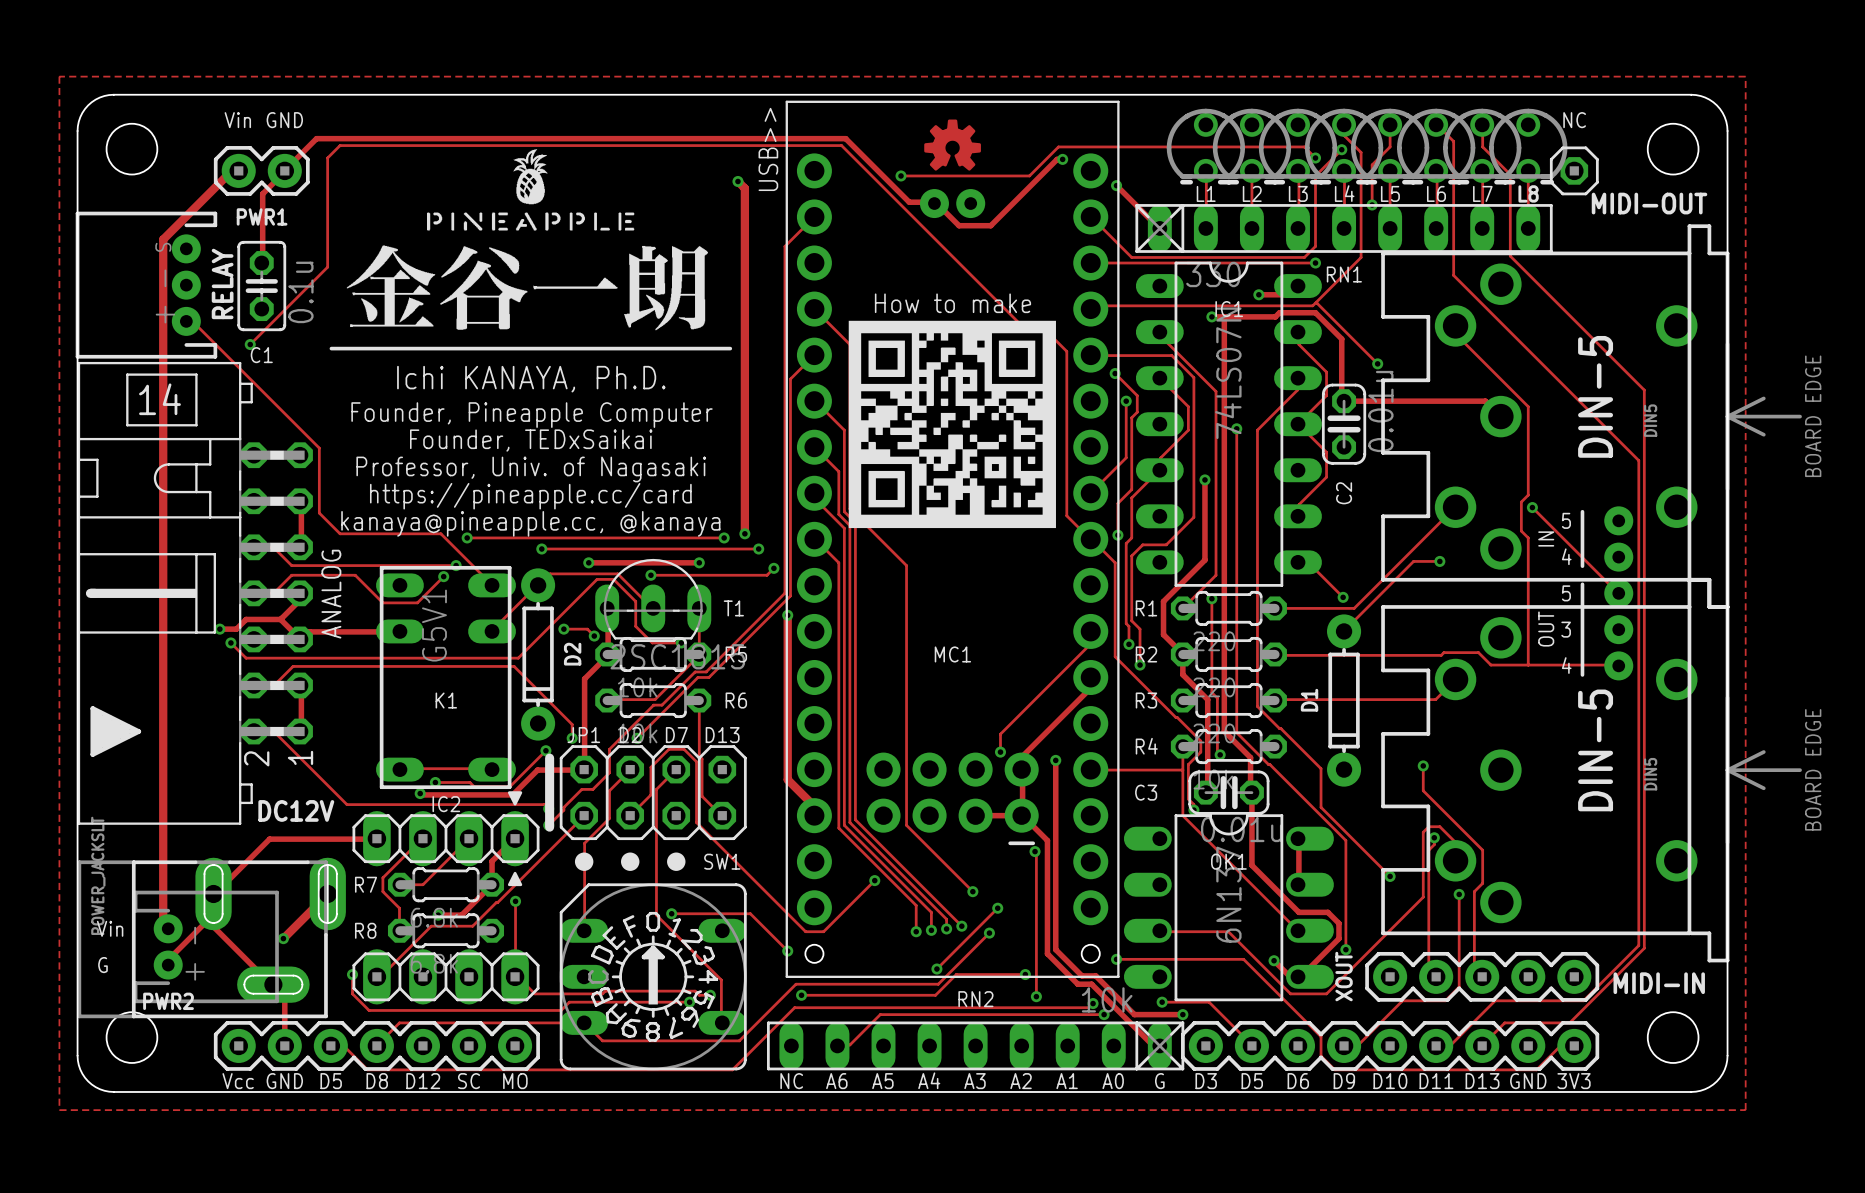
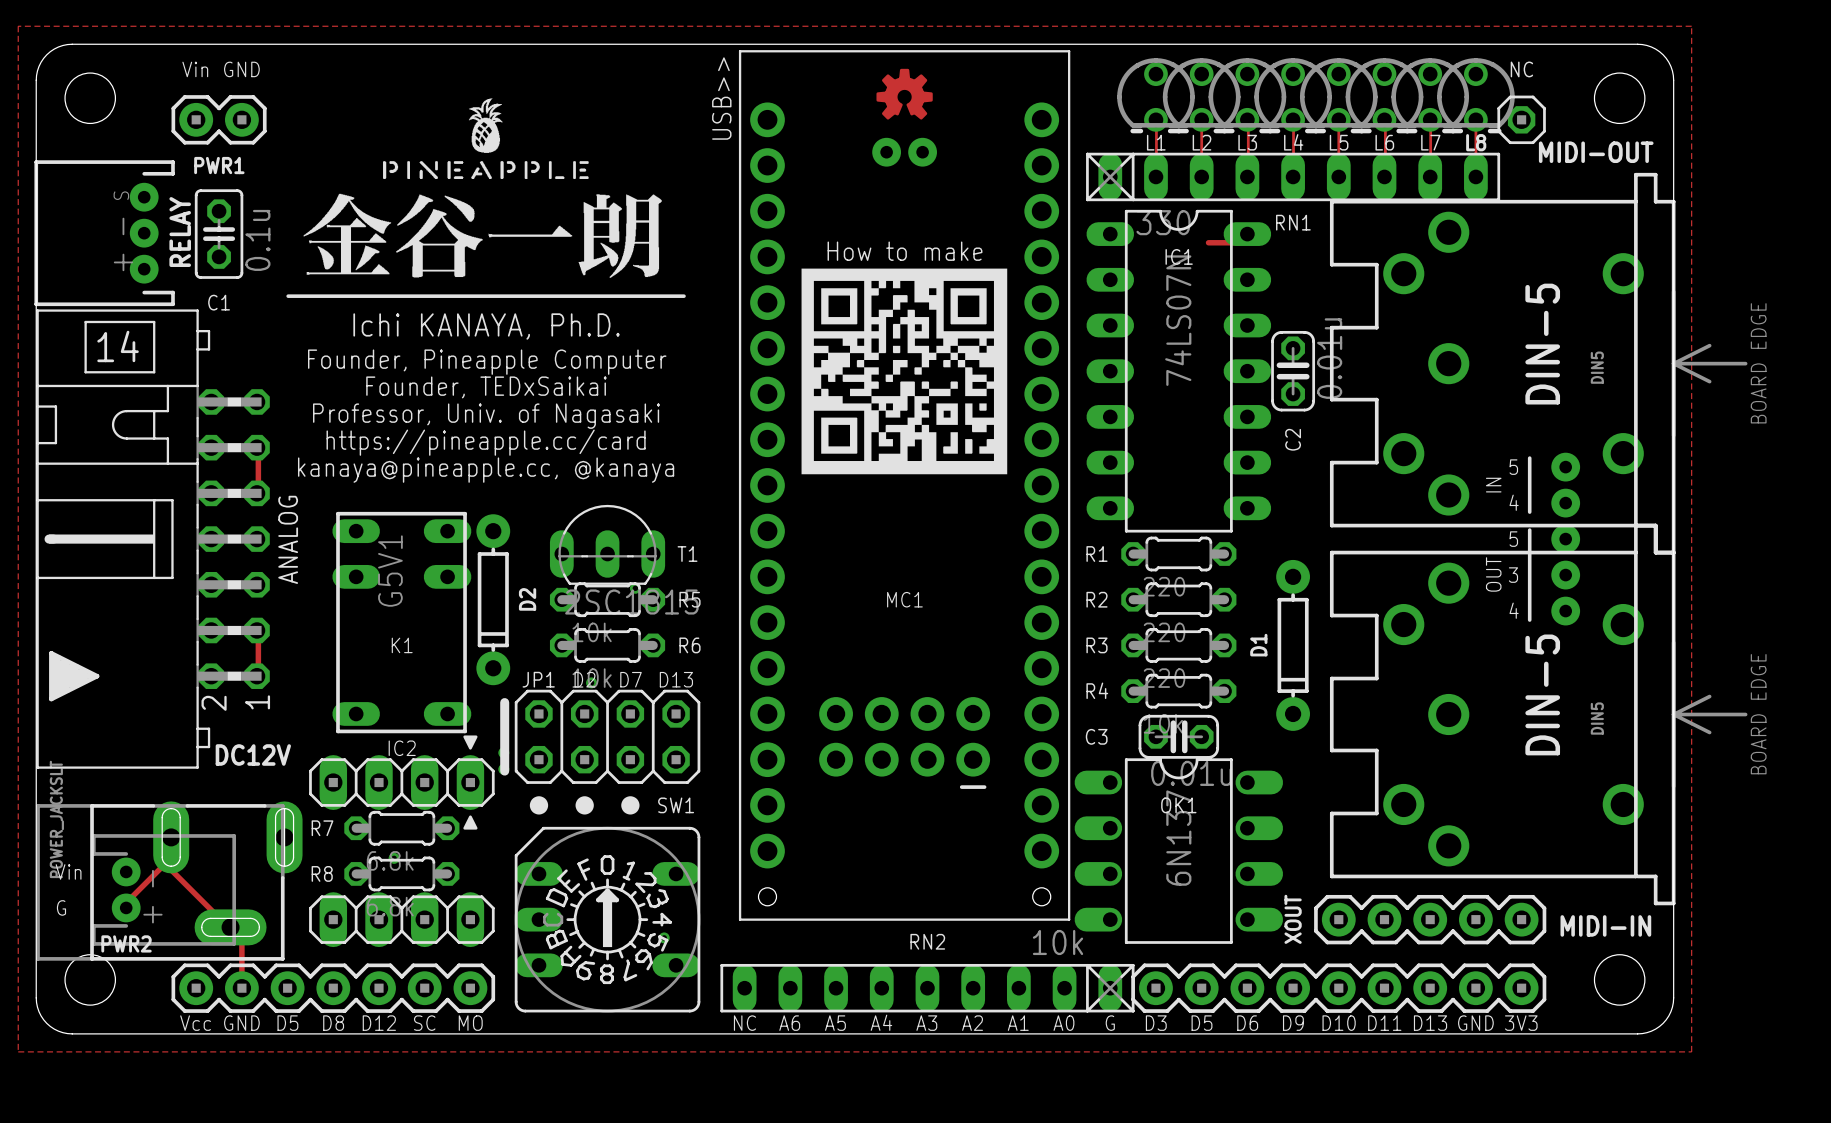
track: (1344, 124) (1344, 135) (1361, 152) (1361, 257) (1312, 305) (1094, 305) (1090, 309) -> none
track: (1390, 124) (1390, 146) (1372, 164) (1372, 204) -> none
track: (1436, 124) (1453, 141) (1453, 275) (1638, 460) (1638, 945) (1583, 1000) (1495, 1000) (1450, 1045) (1436, 1045) -> none
track: (1482, 124) (1482, 146) (1510, 174) (1510, 256) (1644, 390) (1644, 948) (1569, 1022) (1504, 1022) (1482, 1045) -> none
track: (1341, 149) (1315, 175) (1315, 246) (1304, 257) (1131, 257) (1090, 216) -> none
via: (1341, 149) -> none
track: (1315, 158) (1304, 146) (1058, 146) (1029, 175) (901, 175) -> none
via: (1315, 158) -> none
track: (1062, 159) (1057, 159) (990, 225) (959, 225) (934, 202) (909, 202) (845, 138) (316, 138) (262, 193) (261, 263) -> none
via: (1062, 159) -> none
track: (238, 170) (230, 171) (163, 239) (163, 923) (168, 928) -> none
via: (901, 175) -> none
track: (737, 181) (744, 188) (744, 533) -> none
via: (737, 181) -> none
track: (1116, 185) (1159, 228) -> none
via: (1116, 185) -> none
via: (1372, 204) -> none
track: (814, 216) (784, 246) (784, 593) (706, 671) (695, 671) (661, 705) (653, 705) (609, 749) (609, 772) (592, 789) (581, 789) (548, 825) -> none
track: (1090, 263) (1315, 263) -> none
via: (1315, 263) -> none
via: (1258, 294) -> none
track: (1316, 302) (1377, 363) -> none
track: (814, 309) (849, 344) (849, 508) (906, 565) (906, 825) (972, 891) -> none
track: (1211, 316) (1275, 316) (1279, 312) (1315, 312) (1341, 339) (1341, 399) (1344, 401) (1485, 401) (1500, 416) -> none
via: (1211, 316) -> none
track: (1224, 316) (1224, 731) (1250, 757) (1251, 865) (1298, 912) (1327, 912) (1338, 923) (1338, 938) (1301, 975) (1289, 975) (1274, 960) -> none
track: (186, 321) (193, 322) (319, 448) (319, 513) (340, 533) (440, 533) (492, 585) -> none
track: (1455, 325) (1456, 334) (1528, 406) (1528, 495) (1521, 502) (1521, 531) (1528, 537) (1528, 665) -> none
track: (1159, 332) (1160, 336) (1216, 391) (1216, 575) (1182, 608) -> none
track: (1298, 332) (1298, 344) (1326, 372) (1326, 395) (1298, 424) (1326, 452) (1326, 477) (1298, 504) (1298, 516) -> none
track: (250, 344) (327, 267) (327, 158) (340, 145) (841, 145) (1026, 330) (1046, 330) (1066, 351) (1066, 515) (1115, 562) (1115, 656) (1200, 741) (1200, 752) (1188, 764) (1188, 799) (1193, 804) (1193, 810) -> none
via: (250, 344) -> none
track: (814, 355) (790, 379) (790, 595) (708, 677) (697, 677) (637, 738) -> none
track: (1090, 355) (1171, 355) (1193, 377) (1193, 517) (1166, 544) (1142, 544) (1131, 555) (1131, 620) (1140, 629) (1140, 665) -> none
via: (1377, 363) -> none
track: (1115, 373) (1137, 395) (1137, 412) (1131, 417) (1131, 489) (1117, 503) (1117, 535) -> none
via: (1115, 373) -> none
track: (1159, 378) (1188, 406) (1188, 430) (1160, 457) (1160, 470) (1131, 497) (1131, 537) (1126, 543) (1126, 623) (1128, 626) (1128, 644) -> none
track: (1298, 378) (1297, 390) (1257, 430) (1257, 706) (1321, 768) (1321, 807) (1390, 876) -> none
track: (814, 401) (844, 430) (844, 511) (855, 522) (855, 819) (961, 926) -> none
track: (1126, 401) (1126, 457) (1090, 493) -> none
via: (1126, 401) -> none
track: (1236, 428) (1236, 732) (1345, 840) (1345, 949) -> none
via: (1236, 428) -> none
track: (814, 447) (838, 471) (838, 514) (849, 525) (849, 822) (946, 919) (946, 928) -> none
track: (1204, 479) (1204, 560) (1163, 601) (1163, 634) (1182, 654) (1182, 674) (1207, 699) (1207, 790) (1205, 792) -> none
via: (1204, 479) -> none
track: (814, 493) (815, 499) (844, 528) (844, 825) (931, 912) (931, 930) -> none
track: (1455, 507) (1354, 608) (1274, 608) -> none
track: (1532, 507) (1618, 593) -> none
via: (1532, 507) -> none
via: (744, 533) -> none
via: (1117, 535) -> none
track: (467, 537) (724, 537) -> none
via: (467, 537) -> none
via: (724, 537) -> none
track: (814, 539) (838, 562) (838, 828) (916, 905) (916, 931) -> none
track: (253, 547) (273, 547) (291, 565) (456, 565) -> none
track: (541, 549) (758, 549) -> none
via: (541, 549) -> none
via: (758, 549) -> none
track: (1439, 561) (1413, 561) (1344, 631) -> none
via: (1439, 561) -> none
track: (588, 562) (699, 562) -> none
via: (588, 562) -> none
via: (699, 562) -> none
track: (1298, 562) (1308, 562) (1343, 597) -> none
via: (456, 565) -> none
track: (773, 568) (766, 575) (650, 575) -> none
via: (773, 568) -> none
via: (650, 575) -> none
track: (443, 576) (417, 602) (382, 602) (355, 575) (291, 575) (273, 593) (253, 593) -> none
via: (443, 576) -> none
track: (300, 593) (300, 600) (280, 619) -> none
via: (1343, 597) -> none
track: (1211, 598) (1211, 692) (1217, 698) (1217, 752) (1220, 754) -> none
via: (1211, 598) -> none
track: (607, 608) (608, 654) (584, 678) (584, 769) (537, 770) (512, 794) (420, 793) -> none
track: (653, 608) (617, 573) (550, 573) (492, 631) -> none
track: (699, 608) (699, 655) (655, 699) (607, 700) -> none
track: (787, 615) (787, 779) (813, 805) (814, 815) -> none
via: (787, 615) -> none
track: (280, 619) (246, 619) (236, 629) (219, 629) -> none
track: (280, 619) (300, 639) (309, 631) (399, 631) -> none
via: (219, 629) -> none
track: (563, 629) (587, 629) (594, 636) -> none
via: (563, 629) -> none
track: (1090, 631) (1090, 644) (1000, 734) (1000, 752) -> none
via: (594, 636) -> none
track: (230, 642) (246, 658) (518, 658) (597, 579) (613, 579) (635, 601) (635, 626) (652, 642) (681, 642) -> none
via: (230, 642) -> none
via: (1128, 644) -> none
track: (1274, 654) (1441, 655) (1443, 652) (1478, 652) (1490, 665) (1618, 665) -> none
via: (1140, 665) -> none
track: (1090, 677) (1090, 688) (1022, 756) (1021, 815) -> none
track: (1455, 679) (1435, 699) (1274, 700) -> none
track: (253, 685) (275, 684) (293, 666) (514, 666) (572, 724) (572, 738) -> none
track: (699, 700) (699, 756) (702, 759) (702, 796) (722, 815) -> none
track: (253, 731) (275, 732) (346, 804) (544, 804) (548, 808) -> none
via: (572, 738) -> none
track: (1182, 746) (1182, 815) (1298, 930) -> none
track: (545, 750) (510, 786) (474, 786) (469, 782) (435, 782) -> none
via: (545, 750) -> none
via: (1000, 752) -> none
via: (1220, 754) -> none
track: (1055, 760) (1055, 949) (1082, 975) (1095, 975) (1134, 1014) (1182, 1014) -> none
via: (1055, 760) -> none
track: (1423, 765) (1423, 790) (1482, 850) (1482, 883) (1474, 891) (1474, 969) (1482, 976) -> none
via: (1423, 765) -> none
track: (399, 769) (492, 769) -> none
track: (630, 769) (609, 790) (609, 818) (584, 843) (584, 930) -> none
track: (676, 769) (656, 789) (656, 915) (721, 980) (722, 1022) -> none
track: (1090, 769) (1182, 770) -> none
via: (435, 782) -> none
via: (420, 793) -> none
via: (1193, 810) -> none
track: (584, 815) (472, 926) (431, 926) (381, 975) (376, 976) -> none
track: (630, 815) (650, 794) (650, 767) (668, 749) (684, 749) (696, 761) (696, 822) (805, 931) (823, 931) (874, 880) -> none
track: (975, 815) (1022, 815) (1047, 840) (1047, 953) (1077, 984) (1091, 984) (1152, 1045) (1159, 1045) -> none
track: (1434, 837) (1434, 844) (1428, 850) (1428, 969) (1436, 976) -> none
via: (1434, 837) -> none
track: (376, 838) (269, 839) (213, 893) -> none
track: (422, 838) (382, 877) (382, 891) (399, 908) (399, 930) -> none
track: (469, 838) (422, 884) (399, 884) -> none
track: (515, 838) (492, 861) (492, 884) (461, 915) (438, 915) -> none
track: (1298, 838) (1298, 884) -> none
track: (1035, 851) (1036, 996) -> none
via: (1035, 851) -> none
track: (1455, 860) (1455, 841) (1439, 826) (1428, 826) (1423, 832) (1423, 897) (1326, 993) (1290, 993) (1228, 931) (1159, 930) -> none
via: (1390, 876) -> none
via: (874, 880) -> none
via: (972, 891) -> none
track: (327, 893) (283, 938) -> none
track: (1459, 894) (1459, 986) (1445, 1000) (1402, 1000) (1358, 1045) (1344, 1045) -> none
via: (1459, 894) -> none
track: (515, 901) (515, 976) (516, 975) (534, 993) (602, 993) (605, 991) (695, 991) (699, 995) (710, 995) -> none
via: (515, 901) -> none
track: (997, 908) (936, 969) -> none
via: (997, 908) -> none
track: (671, 913) (750, 913) (787, 951) -> none
via: (671, 913) -> none
via: (961, 926) -> none
via: (946, 928) -> none
via: (931, 930) -> none
via: (916, 931) -> none
track: (989, 933) (938, 984) (796, 984) (739, 1040) (602, 1040) (584, 1022) (399, 1022) (376, 1045) -> none
via: (989, 933) -> none
via: (283, 938) -> none
via: (1345, 949) -> none
via: (787, 951) -> none
track: (1116, 959) (1243, 959) (1321, 1036) (1321, 1056) (1334, 1069) (1536, 1069) (1560, 1046) (1574, 1045) -> none
via: (1116, 959) -> none
via: (1274, 960) -> none
via: (936, 969) -> none
track: (352, 974) (352, 993) (369, 1010) (561, 1010) (569, 1002) (689, 1002) -> none
via: (352, 974) -> none
track: (1025, 974) (956, 974) (935, 995) (801, 995) -> none
via: (1025, 974) -> none
via: (801, 995) -> none
via: (1036, 996) -> none
via: (689, 1002) -> none
track: (1162, 1002) (1209, 1002) (1251, 1045) -> none
via: (1162, 1002) -> none
track: (1093, 1003) (1088, 1007) (794, 1007) (732, 1069) (367, 1069) (344, 1046) (330, 1045) -> none
via: (1093, 1003) -> none
track: (1104, 1014) (880, 1014) (849, 1045) (837, 1045) -> none
via: (1104, 1014) -> none
via: (1182, 1014) -> none

